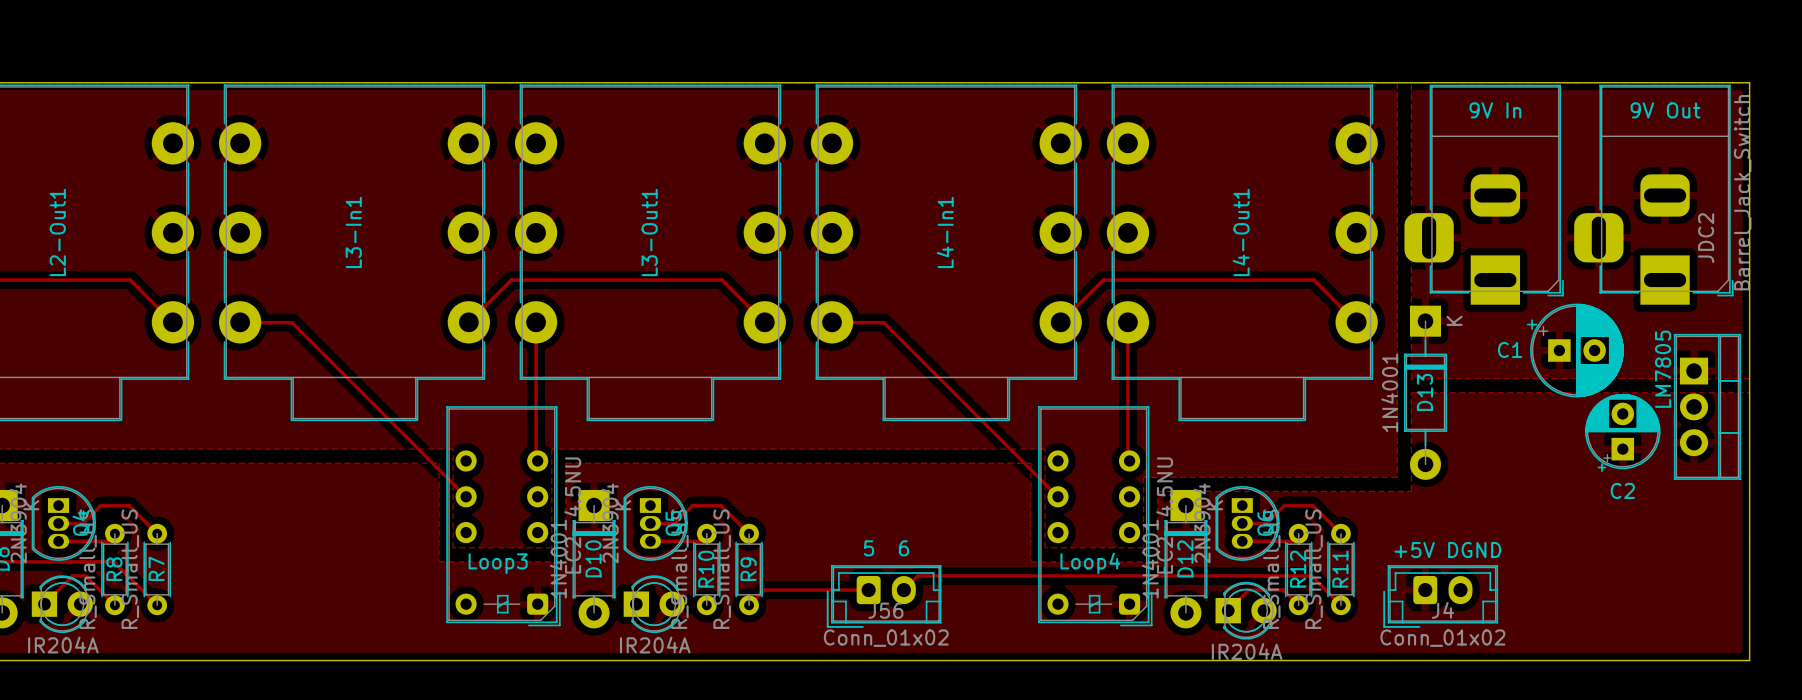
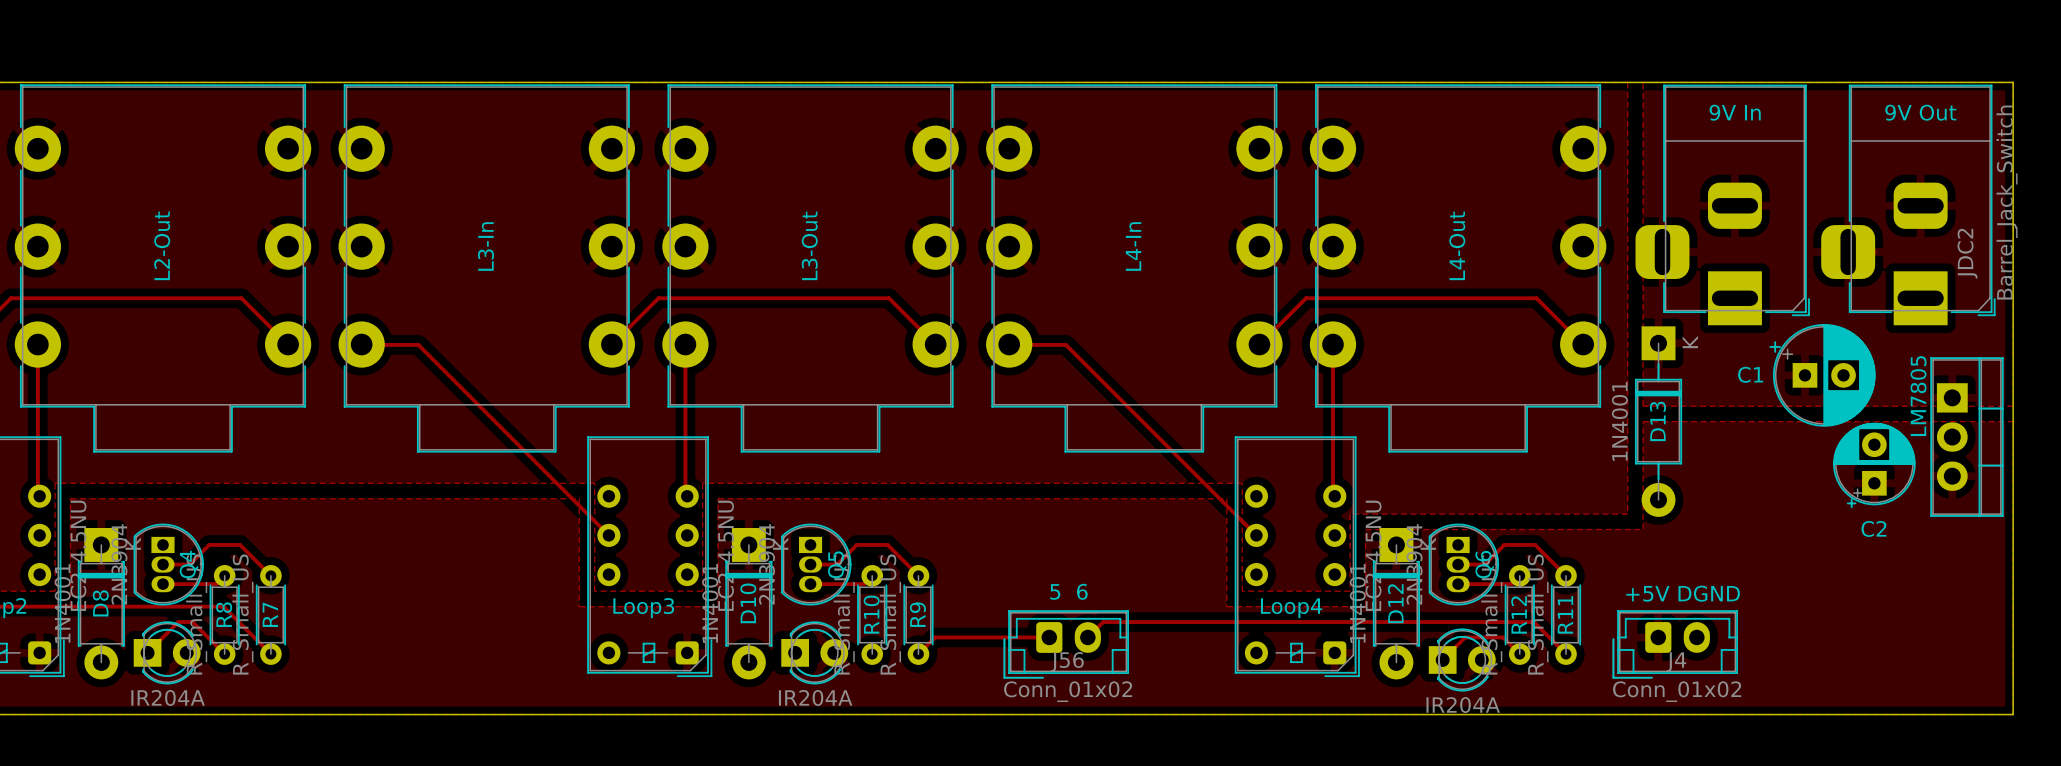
L2-Out1 name: L2-Out1 (57, 232) -> L2-Out (162, 245)
L3-In1 name: L3-In1 (353, 232) -> L3-In (485, 246)
L3-Out1 name: L3-Out1 (649, 232) -> L3-Out (809, 245)
L4-In1 name: L4-In1 (945, 232) -> L4-In (1133, 246)
L4-Out1 name: L4-Out1 (1241, 232) -> L4-Out (1457, 245)

